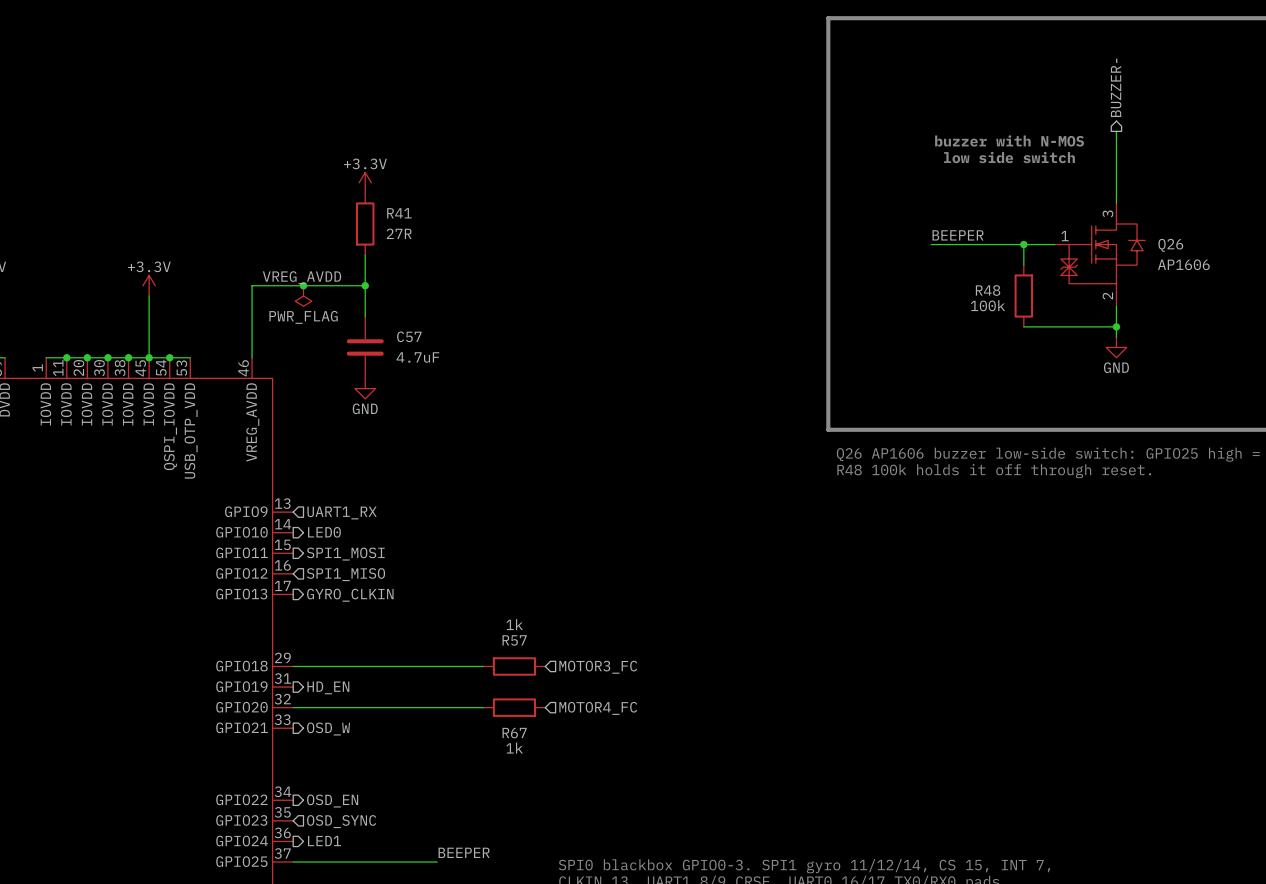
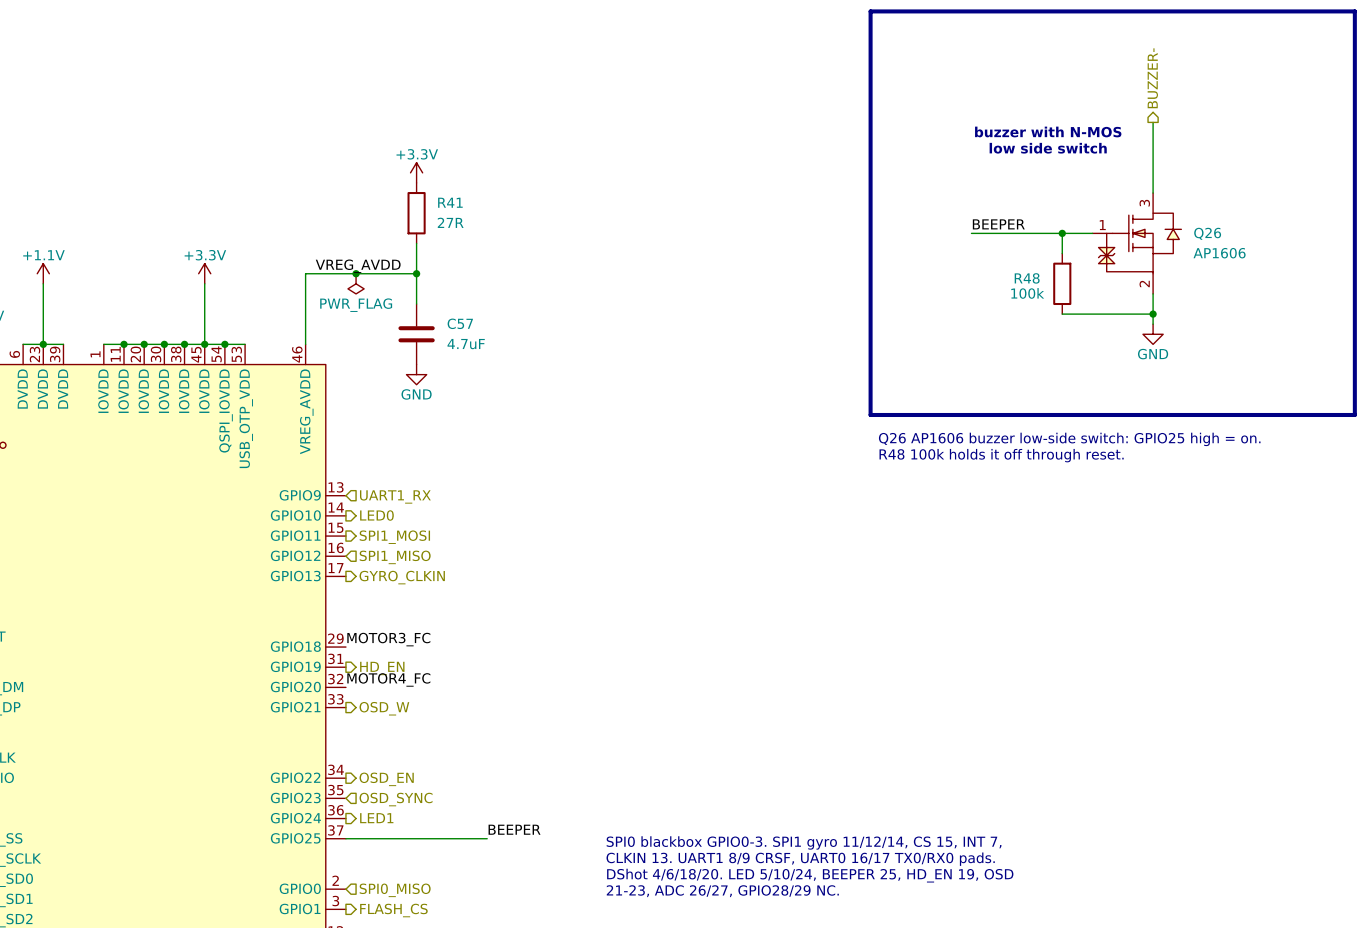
label: none -> MOTOR3_FC (388, 639)
wire: (293, 666) (483, 666) -> none
R57: 1k (514, 666) -> none
hierarchical label: MOTOR3_FC (598, 667) -> none
label: none -> MOTOR4_FC (388, 679)
wire: (293, 707) (483, 707) -> none
R67: 1k (514, 707) -> none
hierarchical label: MOTOR4_FC (598, 708) -> none

